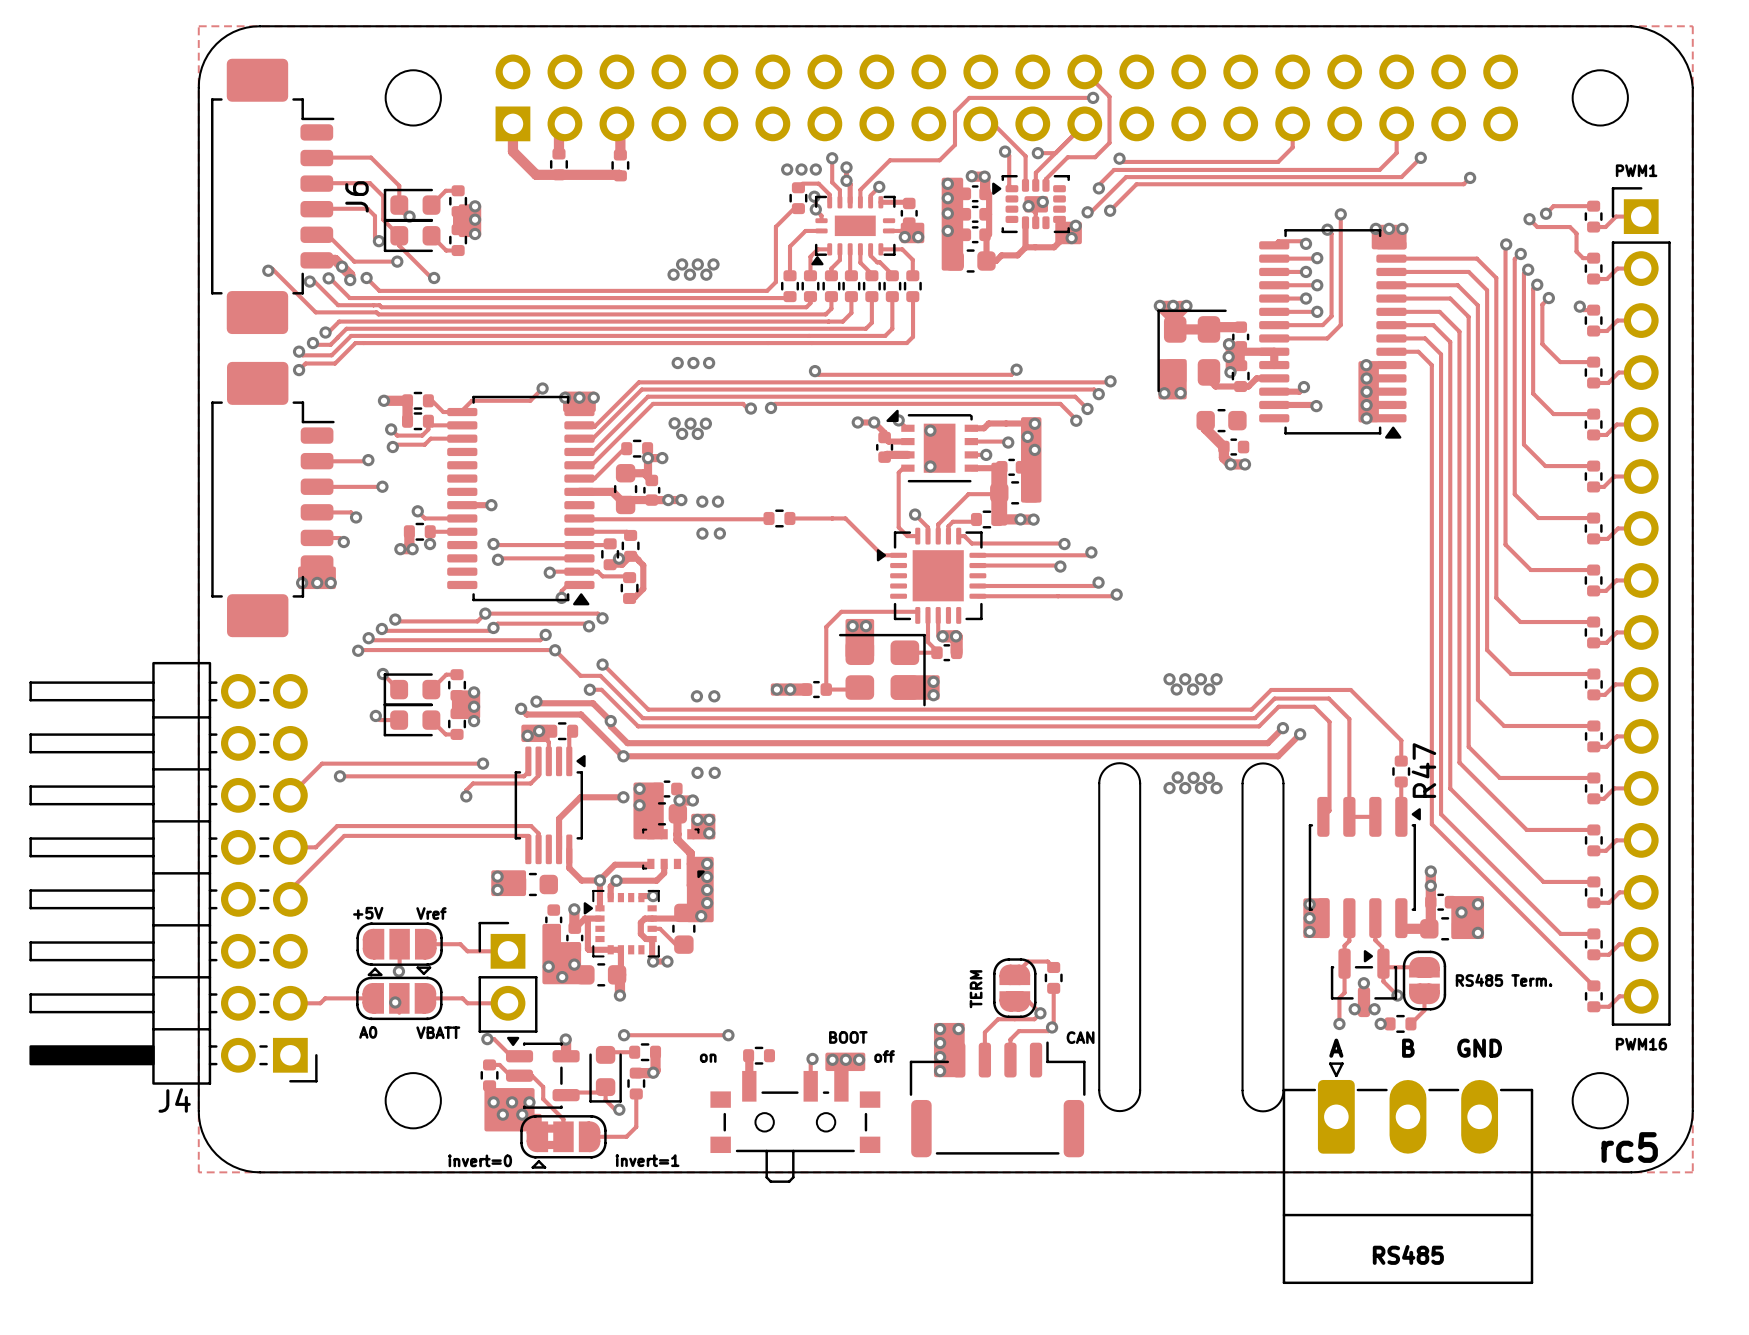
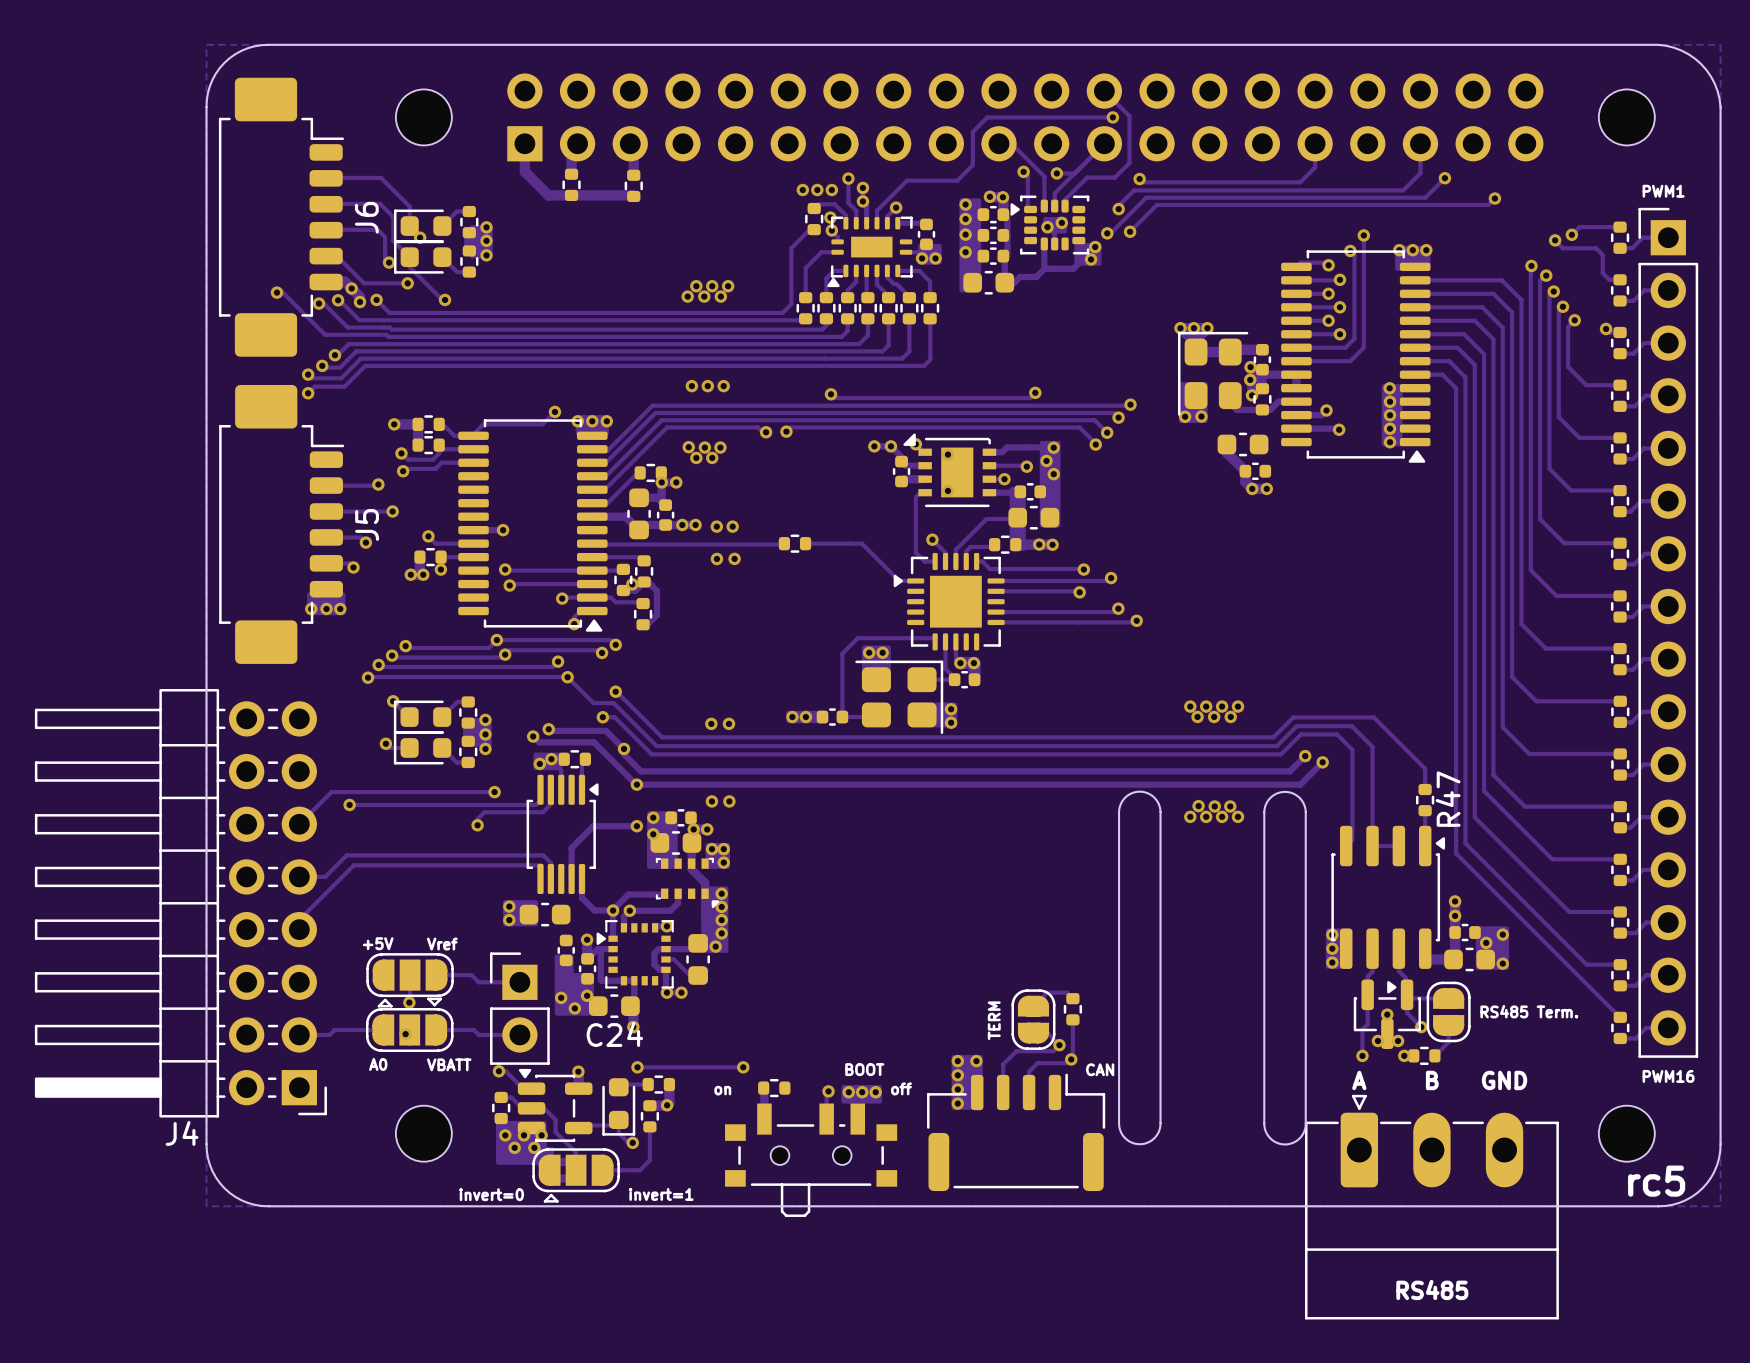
J5 name: none -> J5 (367, 524)
C24 name: none -> C24 (614, 1034)

